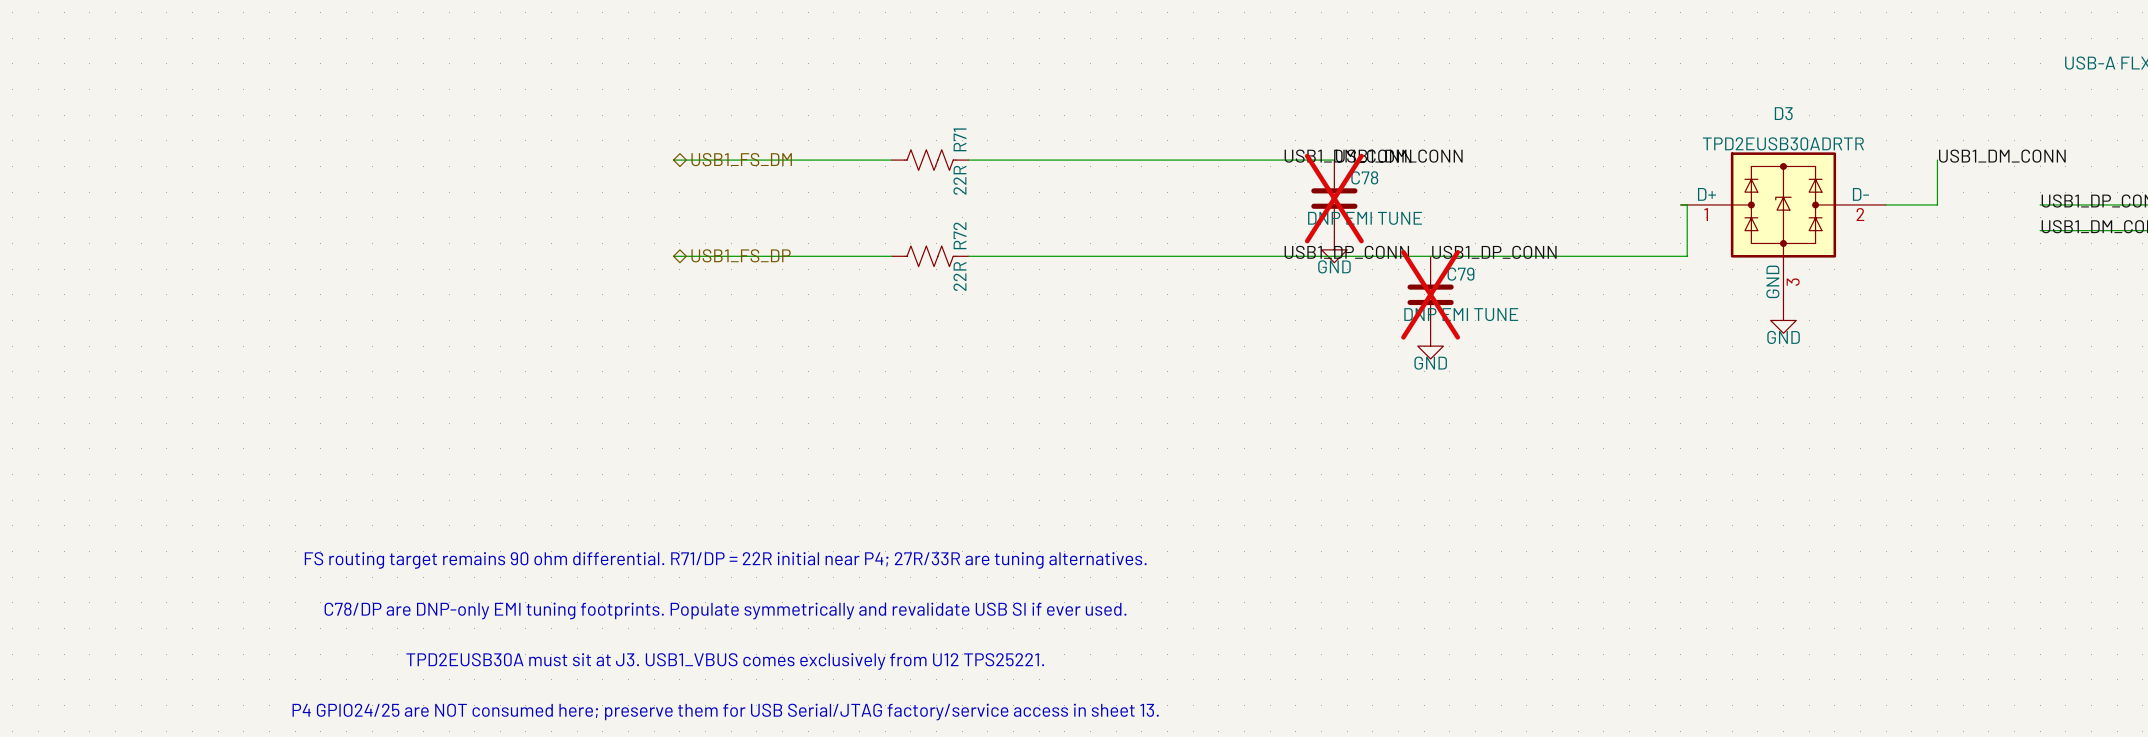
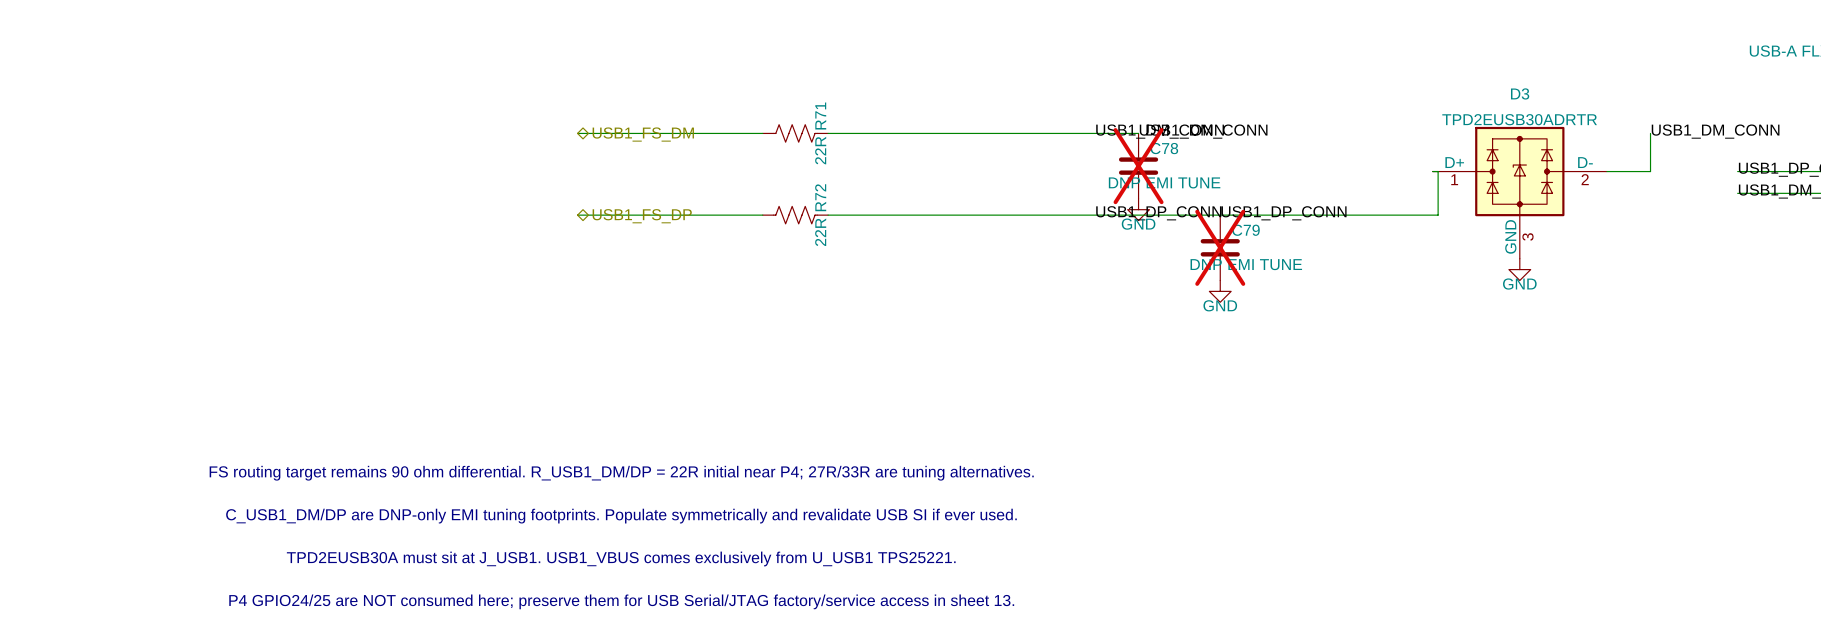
text: FS routing target remains 90 ohm differential. R71/DP = 22R initial near P4; 27R/33R are tuning alternatives. (725, 560) -> FS routing target remains 90 ohm differential. R_USB1_DM/DP = 22R initial near P4; 27R/33R are tuning alternatives. (621, 473)
text: C78/DP are DNP-only EMI tuning footprints. Populate symmetrically and revalidate USB SI if ever used. (725, 610) -> C_USB1_DM/DP are DNP-only EMI tuning footprints. Populate symmetrically and revalidate USB SI if ever used. (621, 516)
text: TPD2EUSB30A must sit at J3. USB1_VBUS comes exclusively from U12 TPS25221. (725, 661) -> TPD2EUSB30A must sit at J_USB1. USB1_VBUS comes exclusively from U_USB1 TPS25221. (621, 558)

